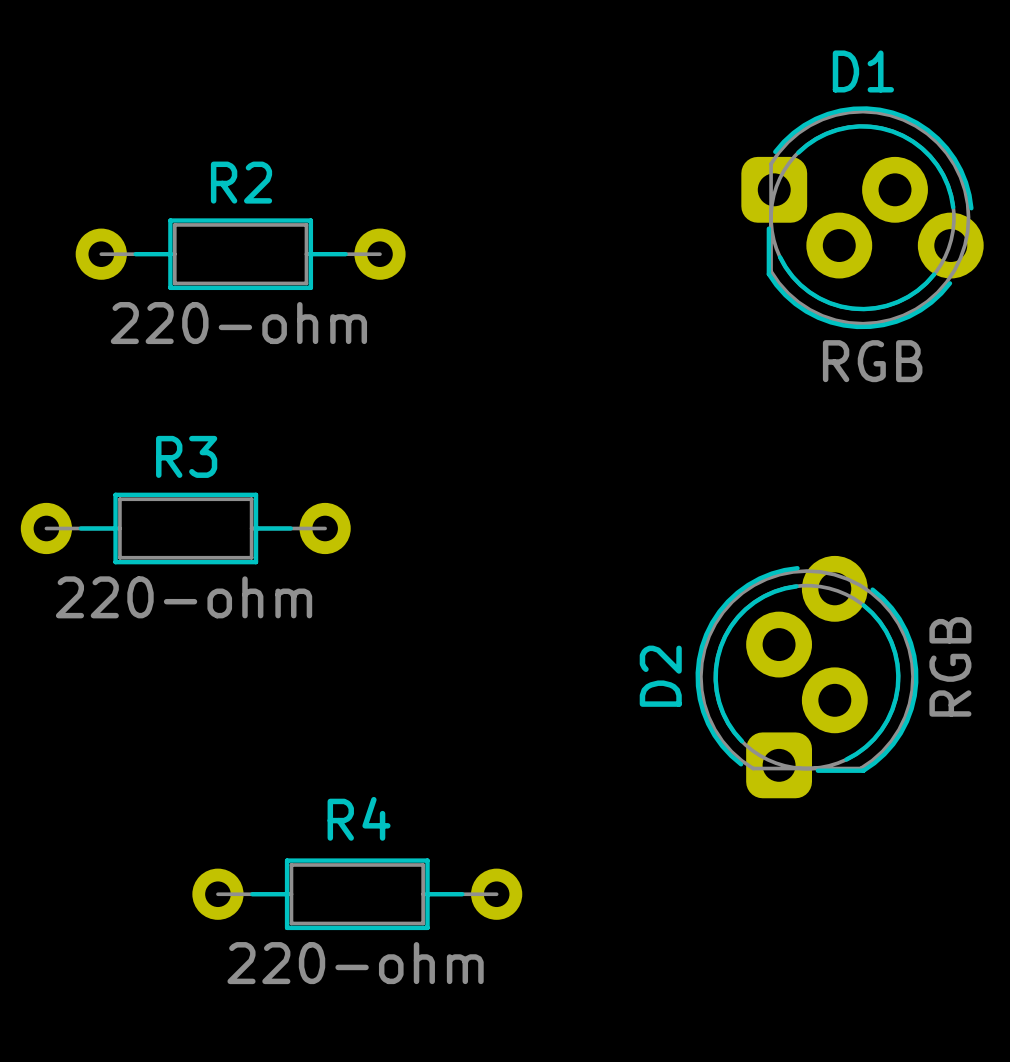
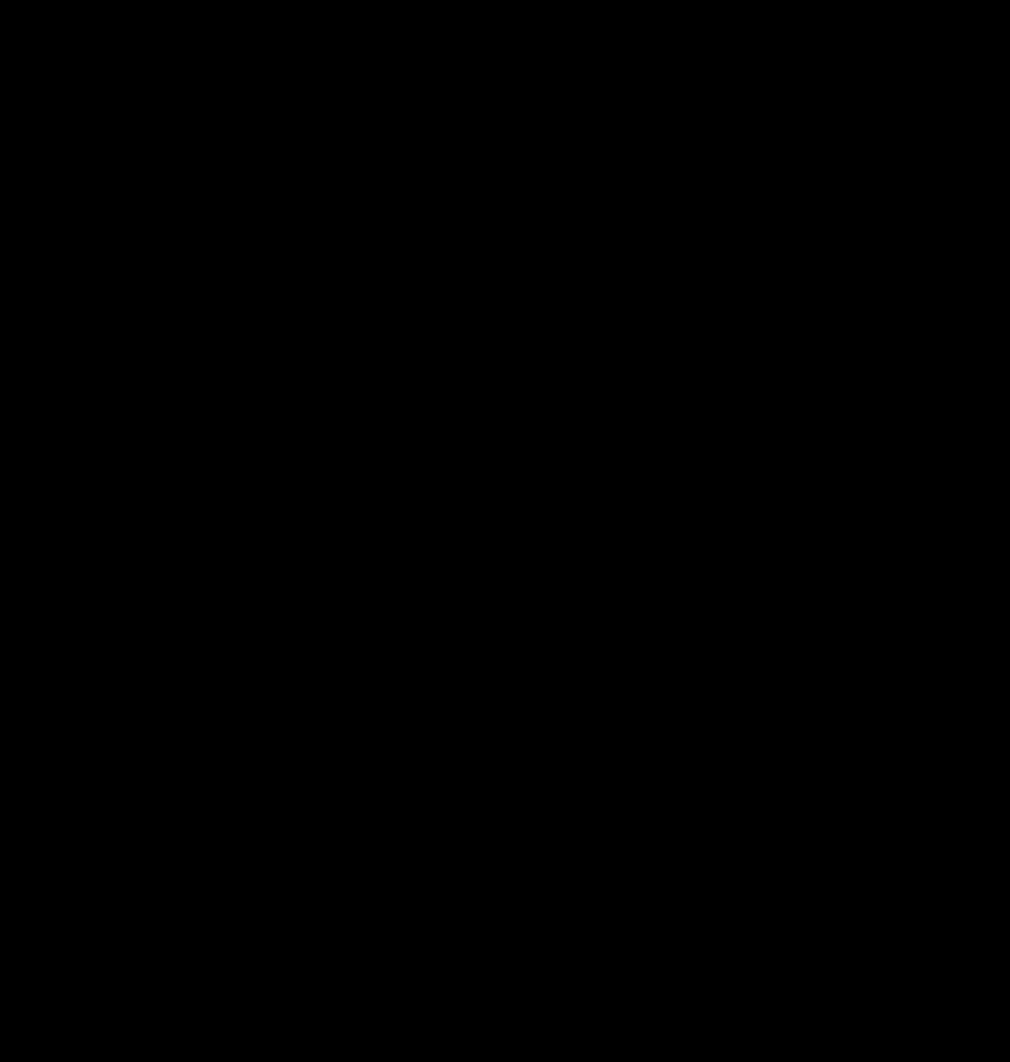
D1: RGB (862, 217) -> none
R2: 220-ohm (240, 254) -> none
R3: 220-ohm (185, 528) -> none
D2: RGB (806, 677) -> none
R4: 220-ohm (357, 894) -> none

